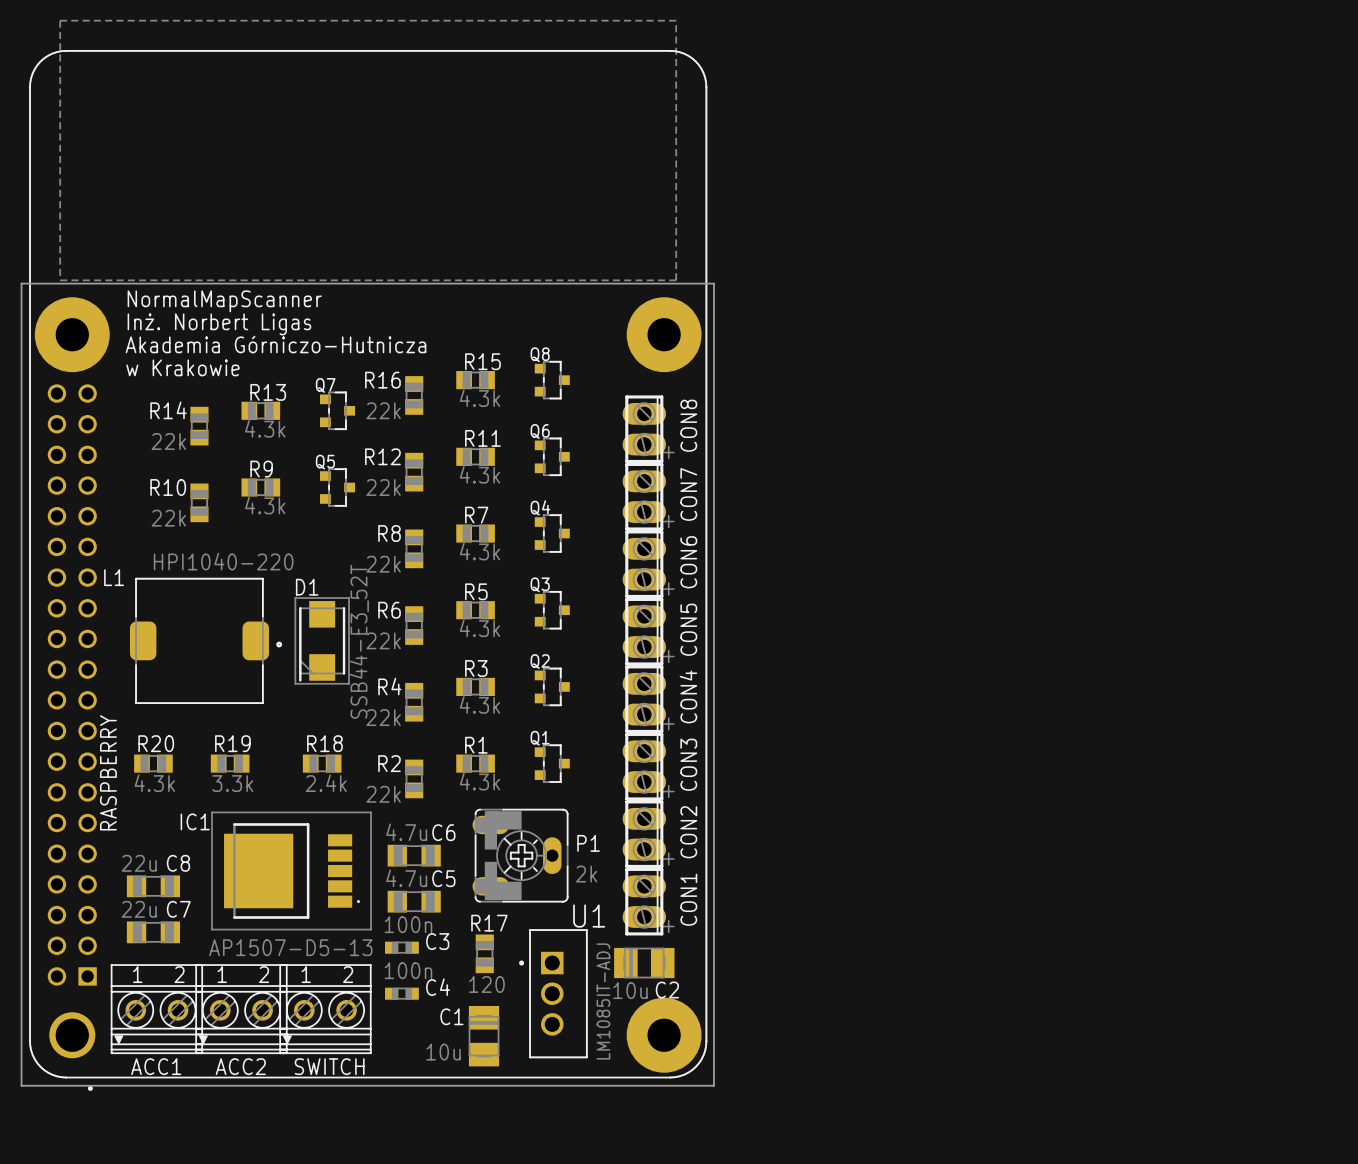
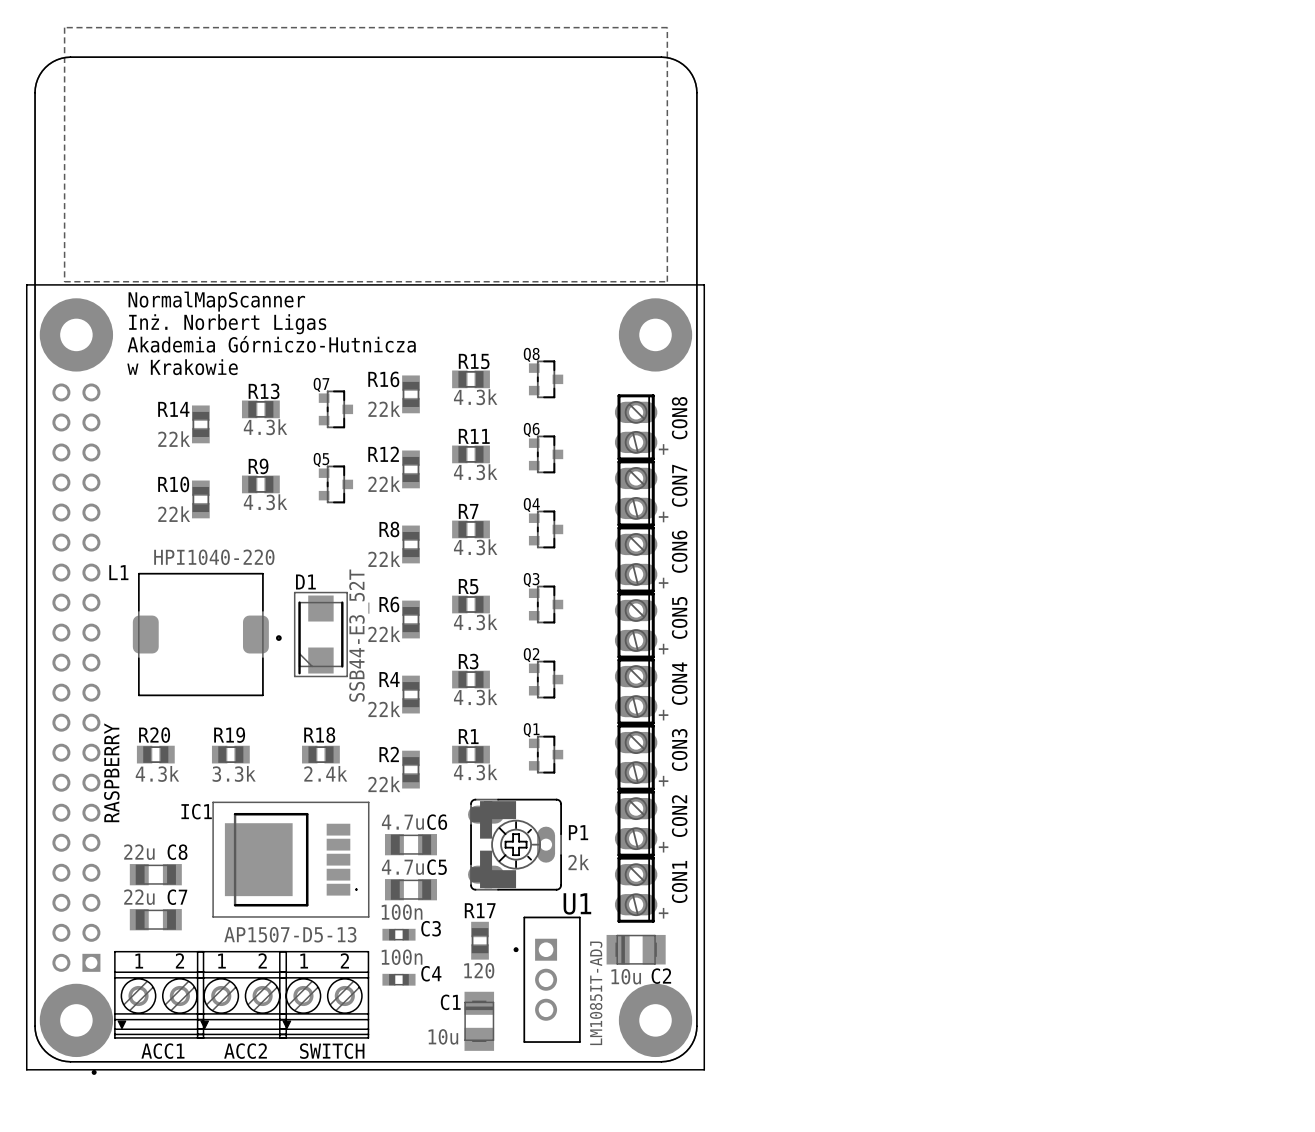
RASPBERRY footprint: [29, 19, 708, 1091] -> [34, 26, 698, 1075]

